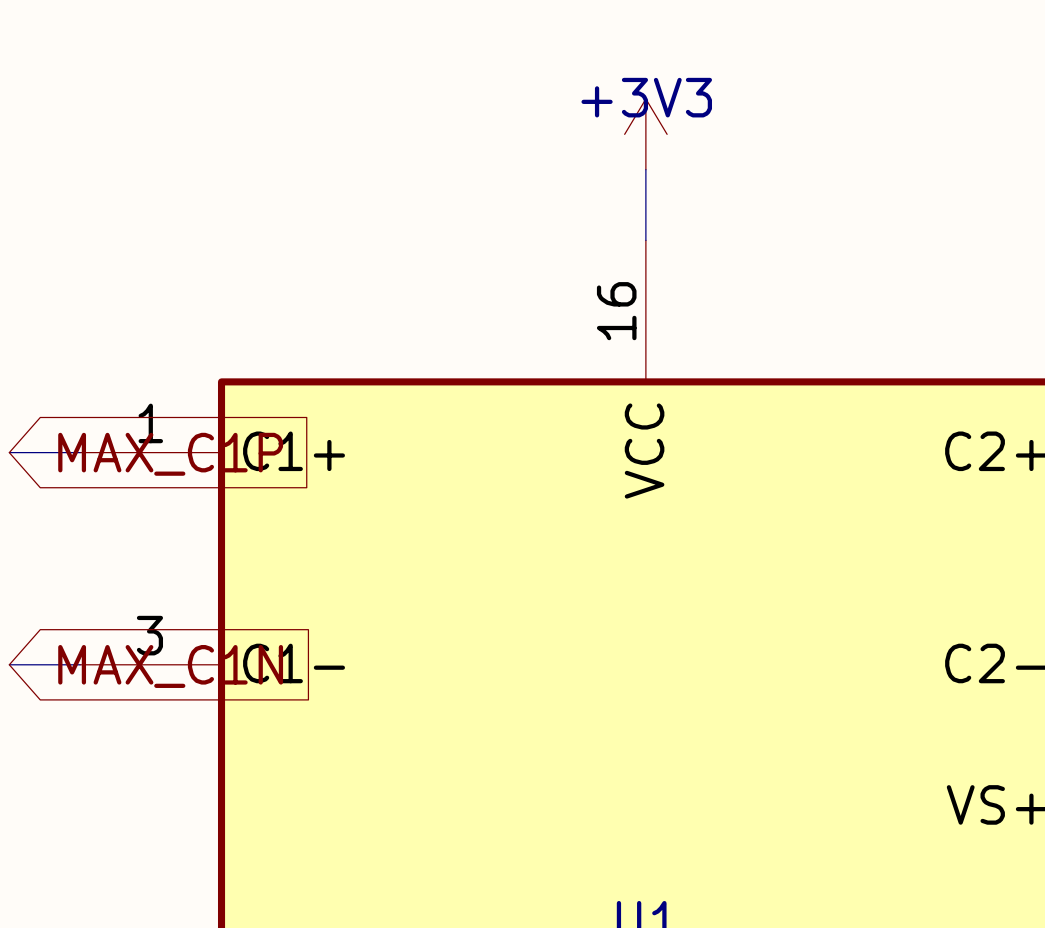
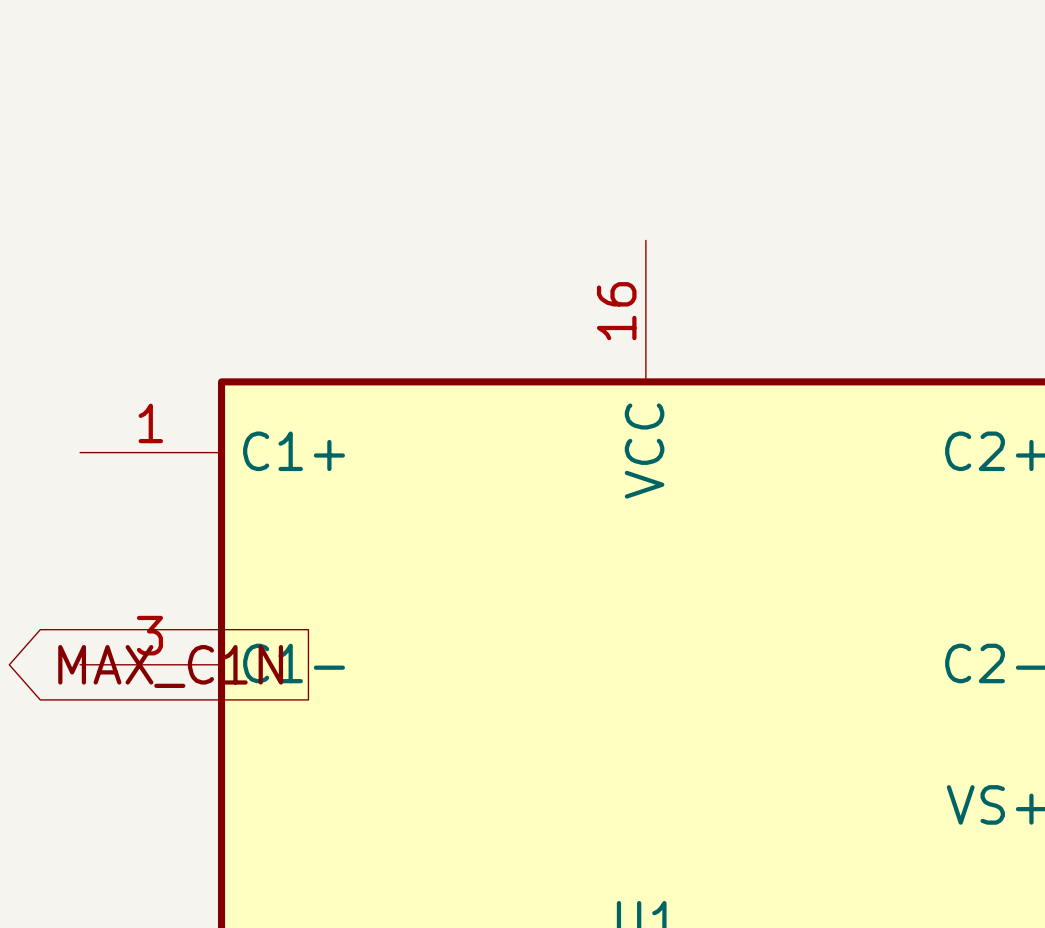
power symbol: +3V3 (645, 134) -> none
wire: (645, 169) (645, 240) -> none
wire: (9, 452) (80, 452) -> none
global label: MAX_C1P (170, 454) -> none
wire: (9, 664) (80, 664) -> none

